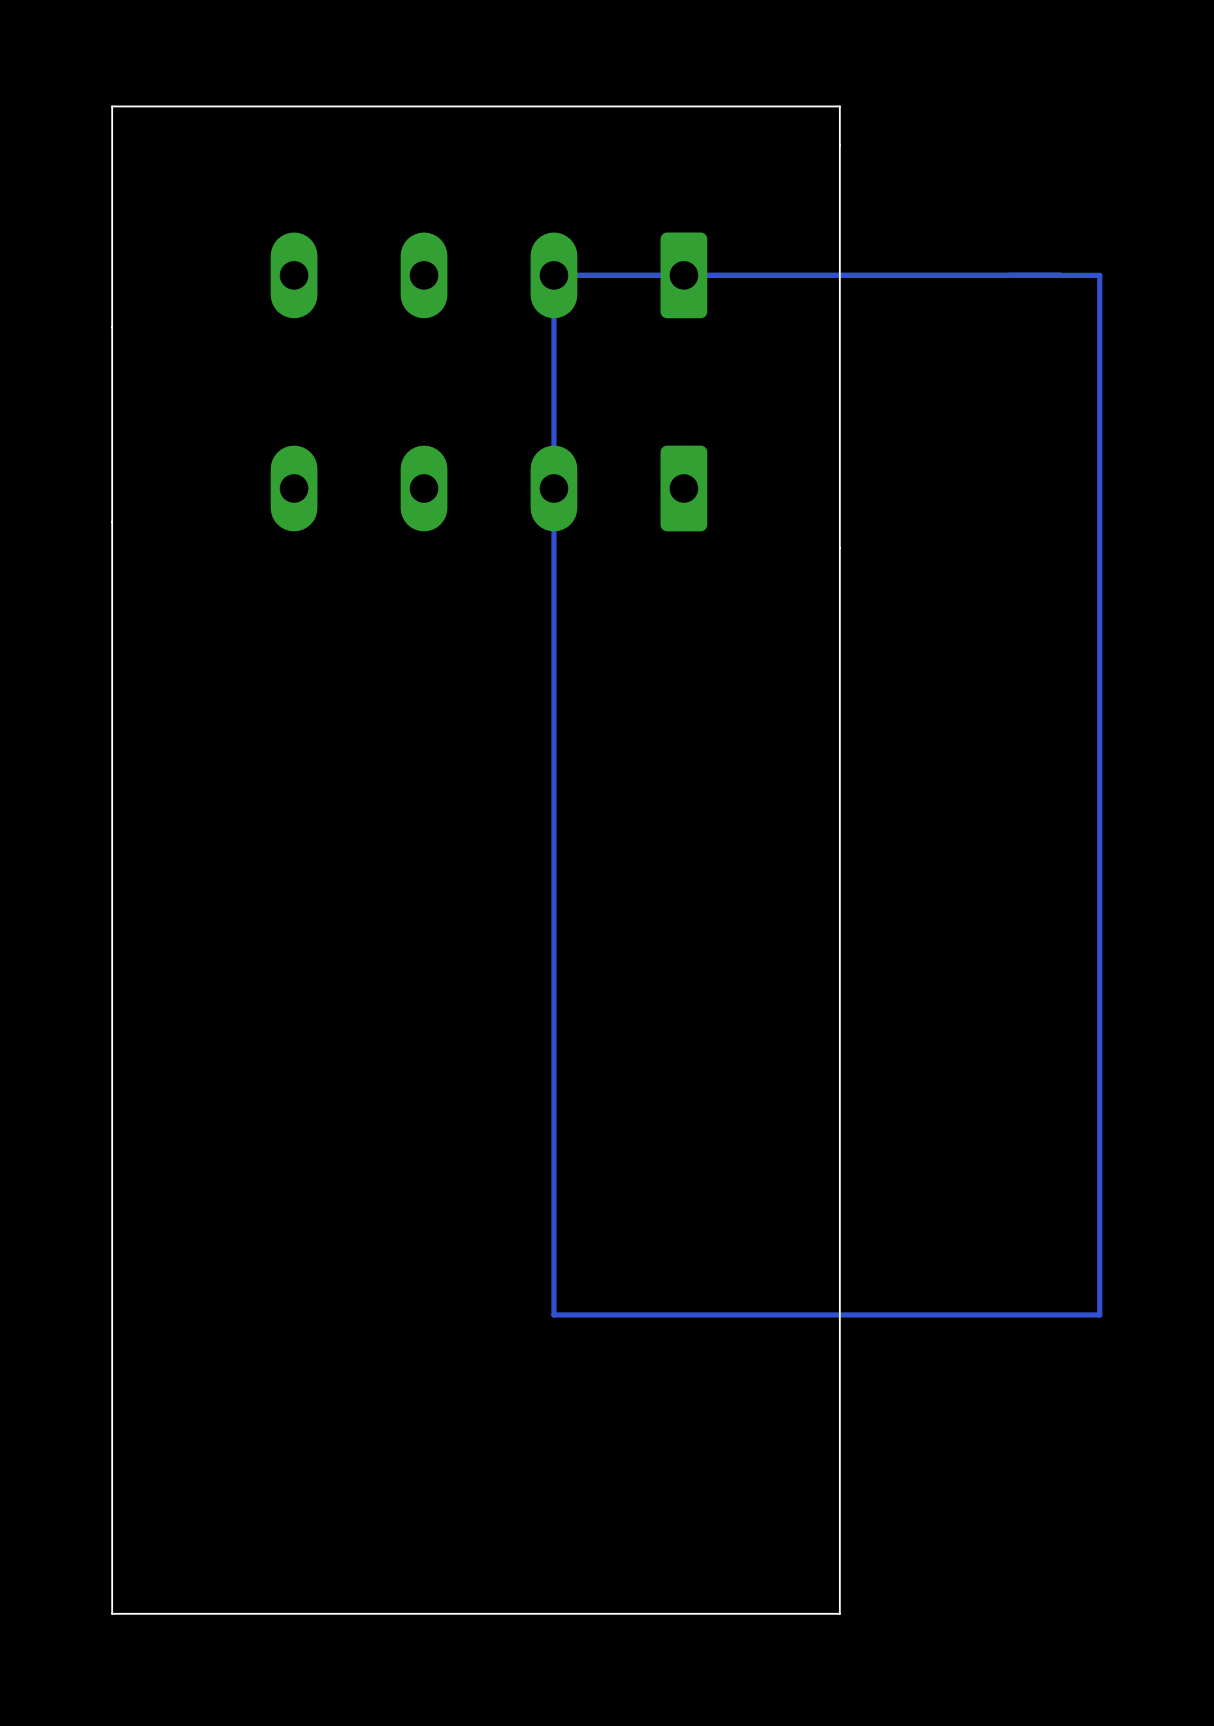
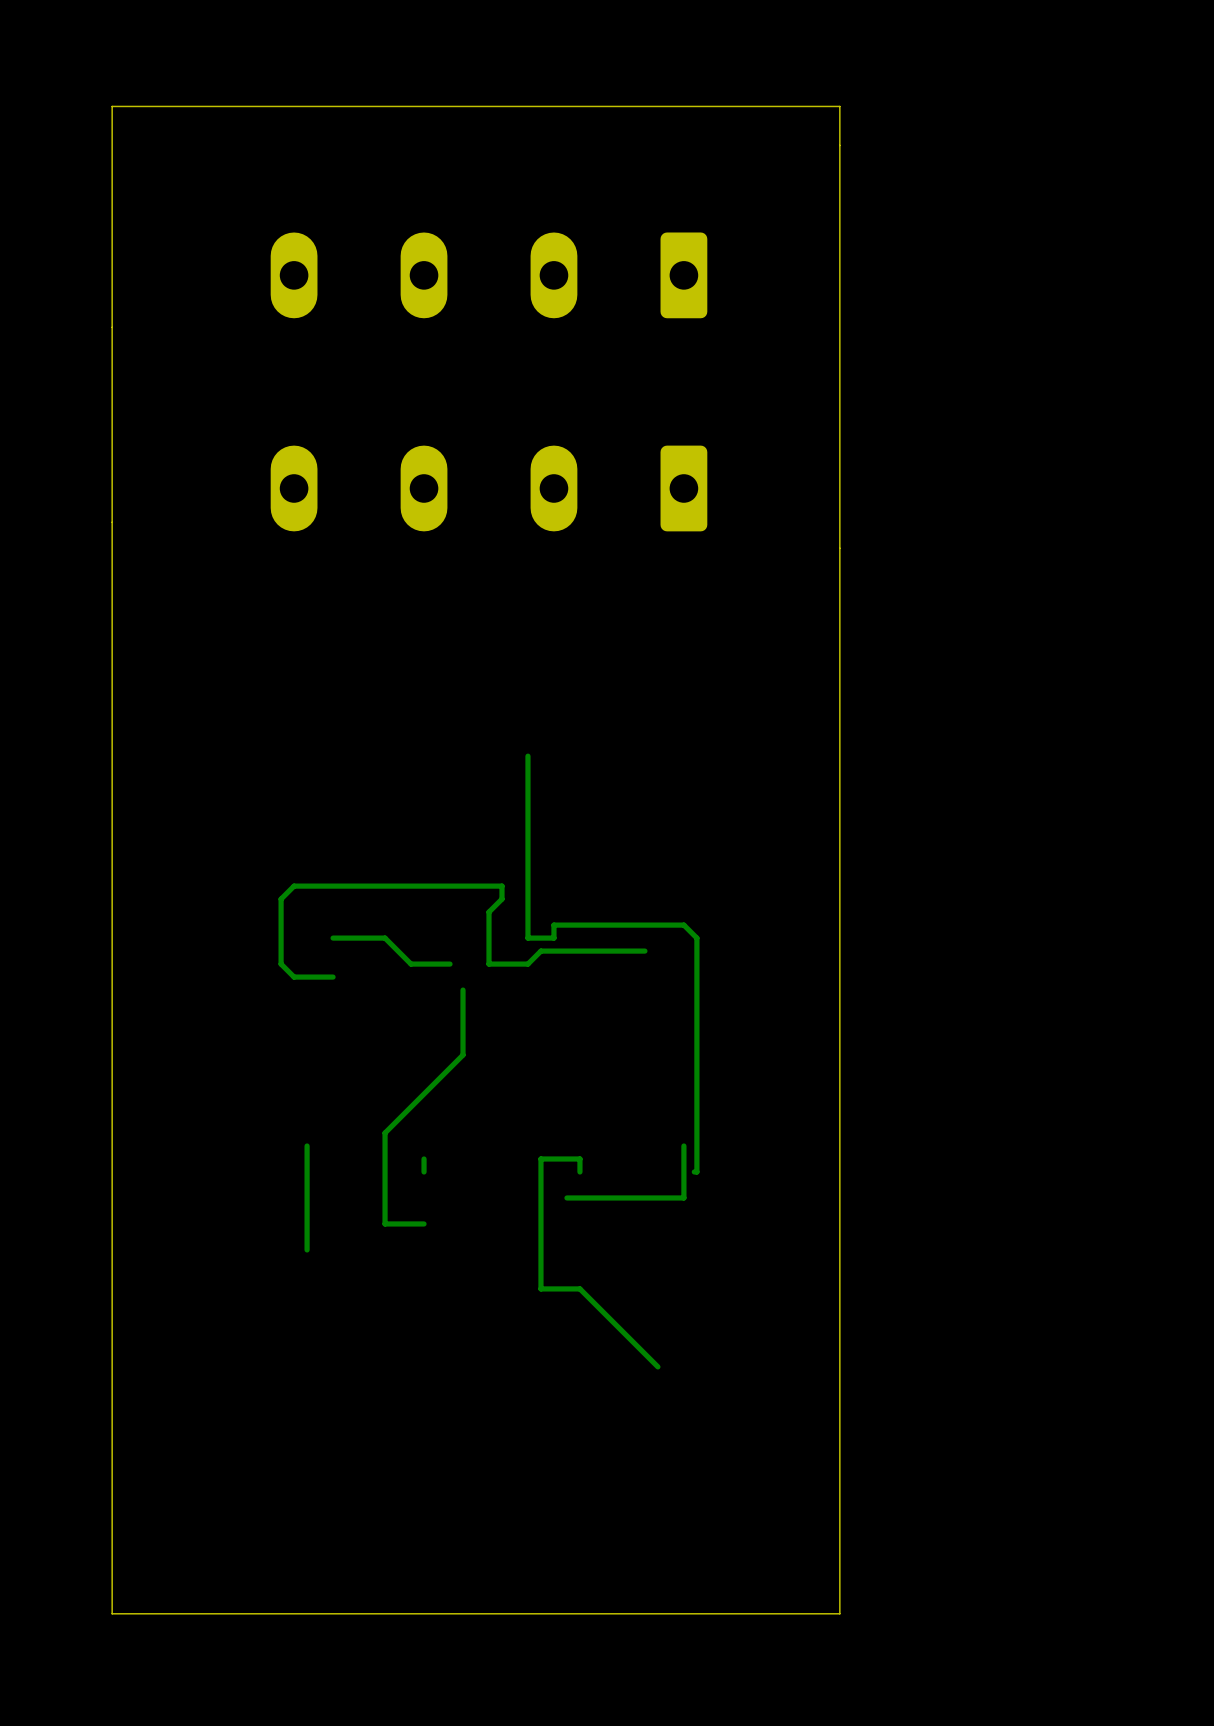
track: (553, 925) (553, 275) (1099, 275) (1099, 1314) (553, 1314) (553, 938) -> (527, 756) (527, 938) (553, 938)
track: none -> (553, 925) (683, 925) (696, 938) (696, 1171) (694, 1171)
track: none -> (333, 938) (385, 938) (411, 964) (450, 964)
track: none -> (644, 951) (540, 951) (527, 964) (488, 964) (488, 912) (501, 899) (501, 886) (294, 886) (281, 899) (281, 964) (294, 977) (333, 977)
track: none -> (463, 990) (463, 1055) (385, 1133) (385, 1223) (424, 1223)
track: none -> (307, 1146) (307, 1249)
track: none -> (683, 1146) (683, 1197) (566, 1197)
track: none -> (424, 1158) (424, 1171)
track: none -> (579, 1171) (579, 1158) (540, 1158) (540, 1288) (579, 1288) (657, 1366)

